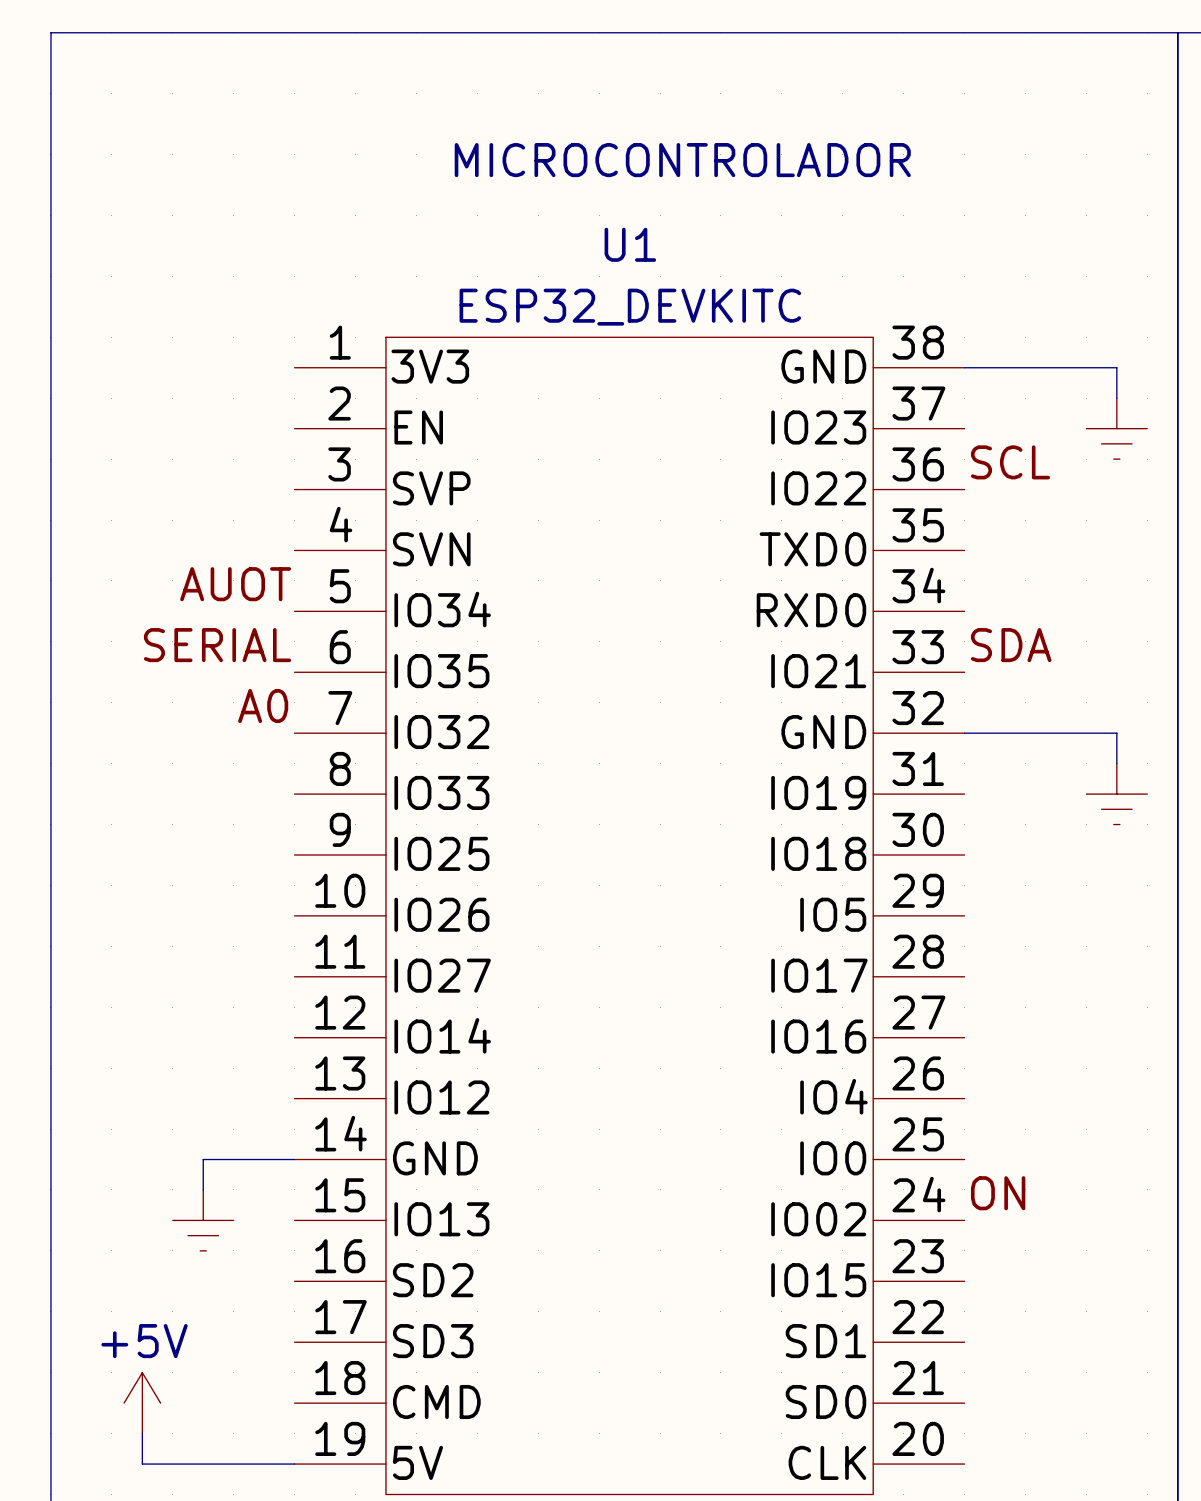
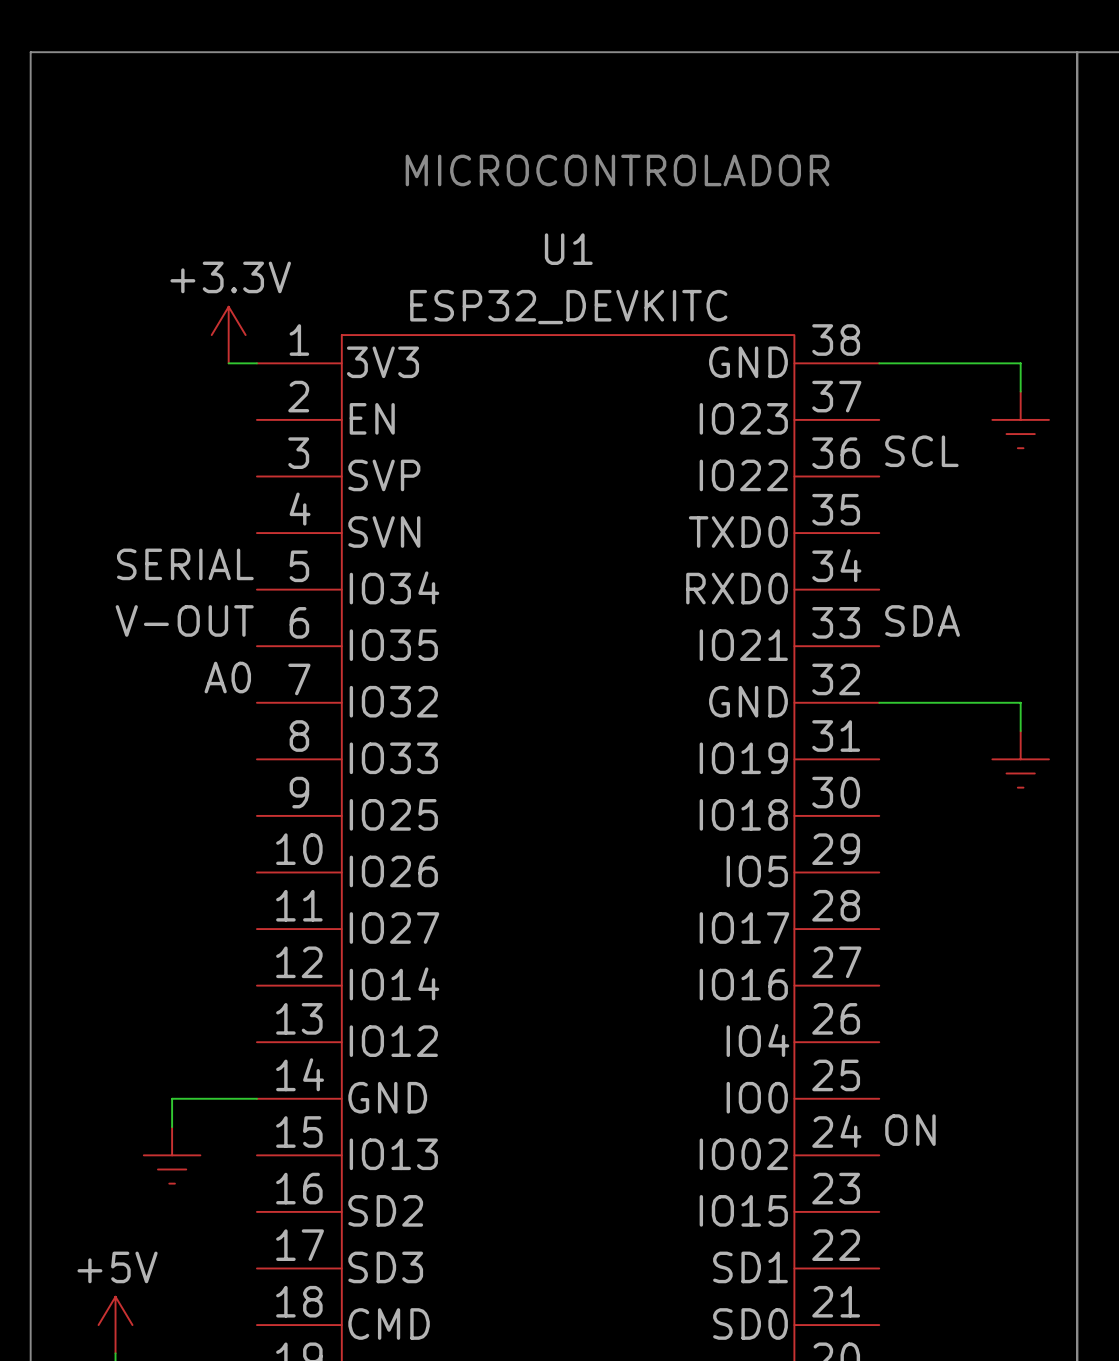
power symbol: none -> +3.3V (228, 335)
wire: none -> (228, 363) (256, 363)
label: AUOT (235, 584) -> SERIAL (185, 564)
label: SERIAL (217, 645) -> V-OUT (184, 620)

